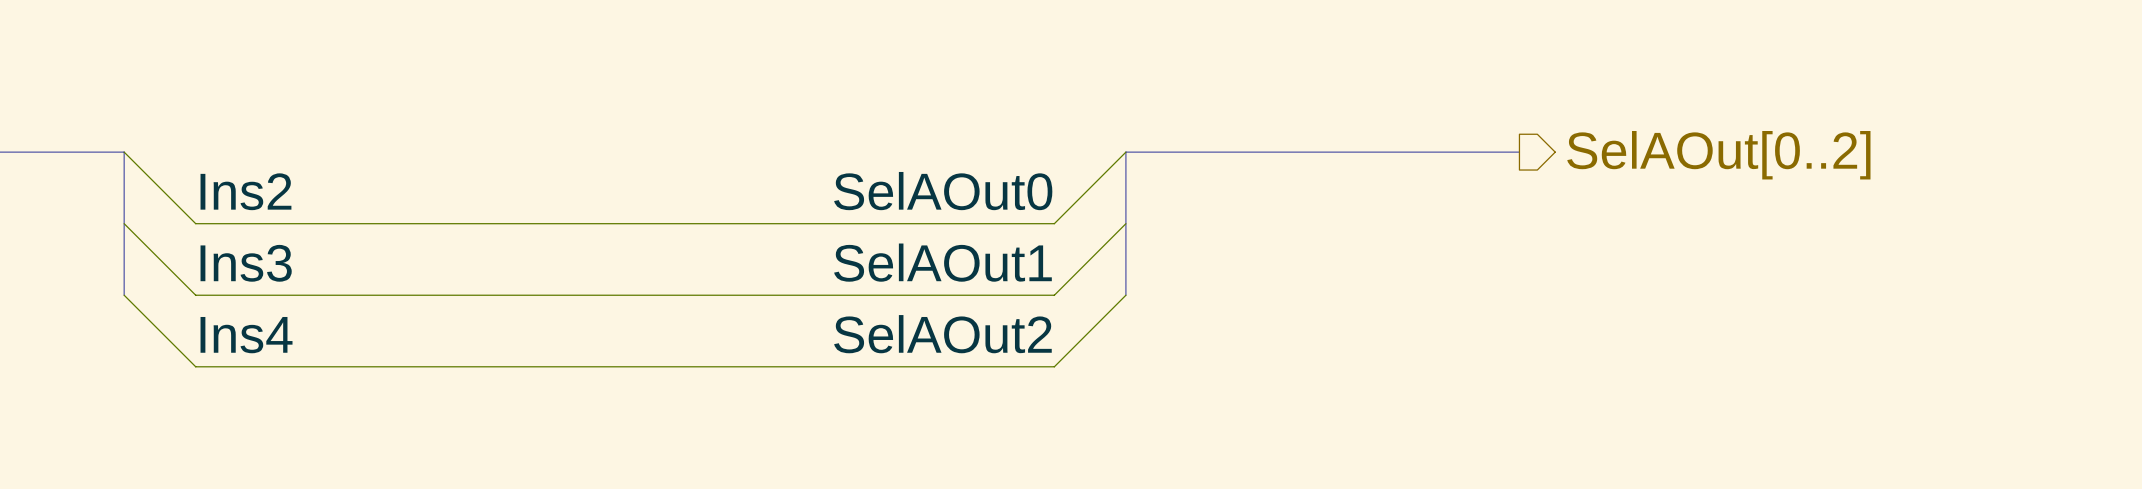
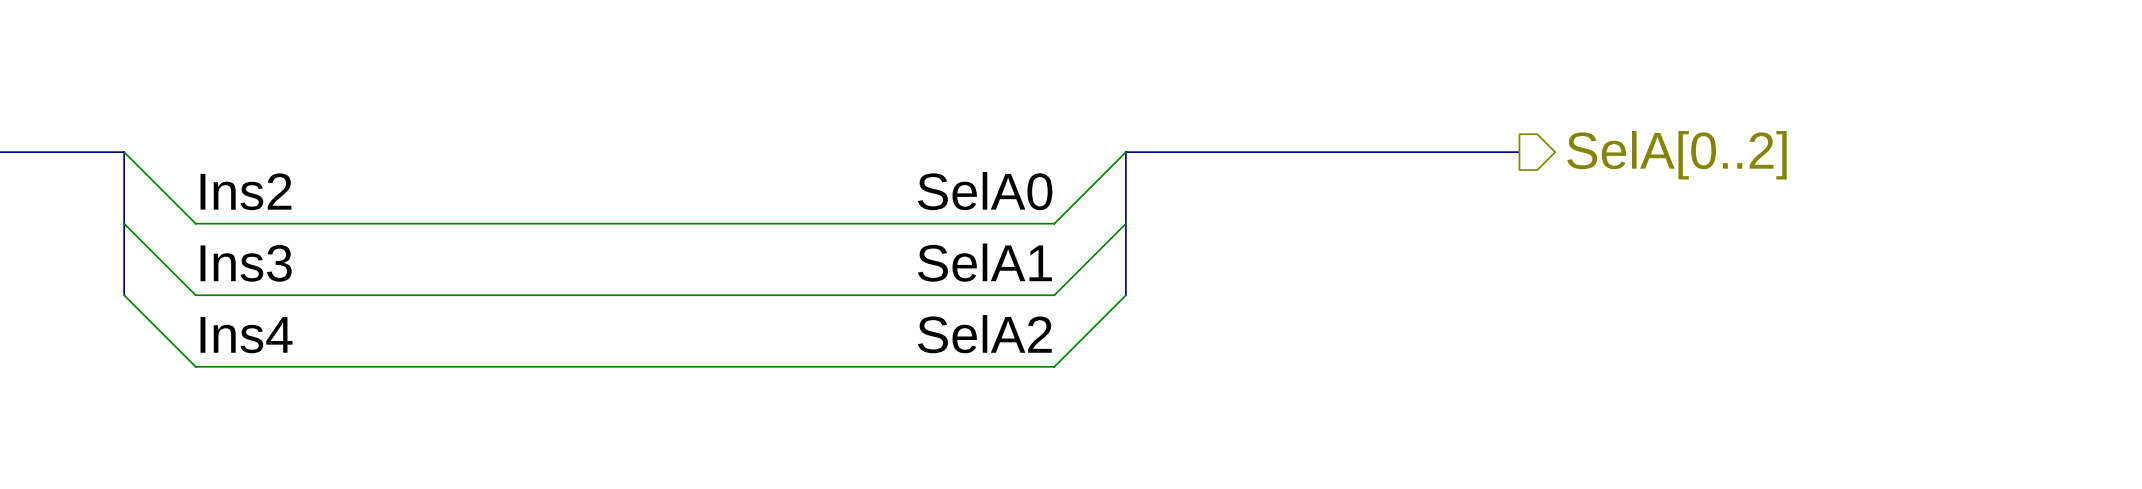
hierarchical label: SelAOut[0..2] (1718, 155) -> SelA[0..2] (1676, 155)
label: SelAOut0 (943, 191) -> SelA0 (985, 191)
label: SelAOut1 (942, 262) -> SelA1 (984, 262)
label: SelAOut2 (942, 334) -> SelA2 (984, 334)

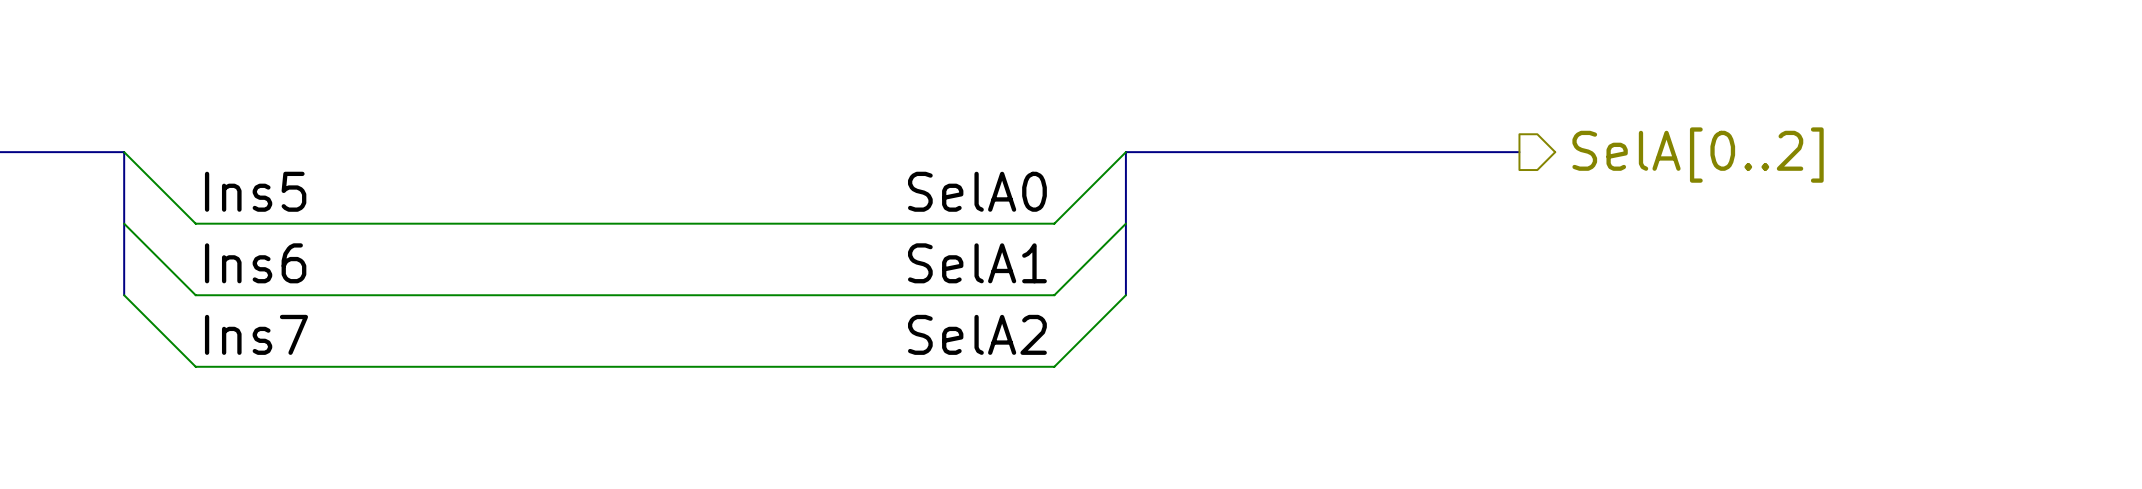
label: Ins2 (245, 191) -> Ins5 (255, 191)
label: Ins3 (246, 263) -> Ins6 (255, 263)
label: Ins4 (246, 335) -> Ins7 (256, 334)

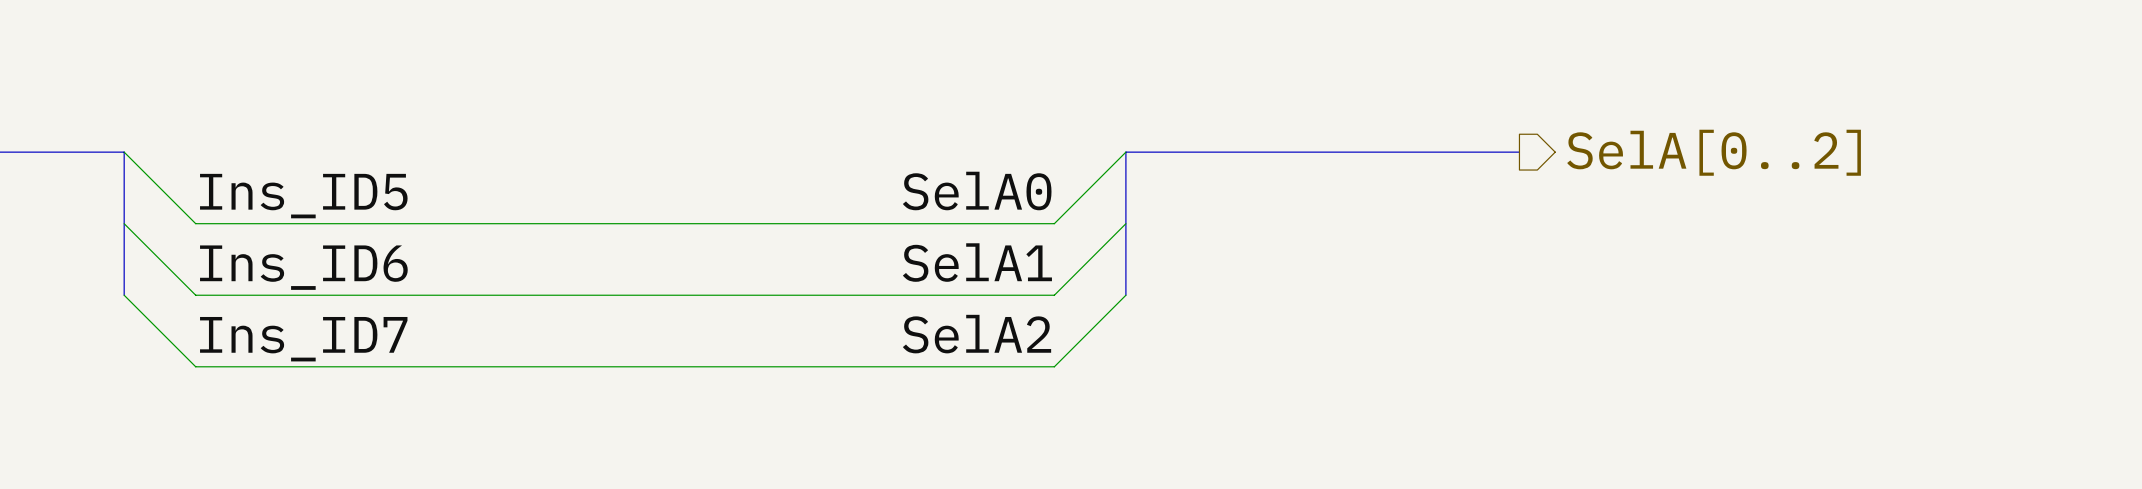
label: Ins5 (255, 191) -> Ins_ID5 (303, 196)
label: Ins6 (255, 263) -> Ins_ID6 (303, 267)
label: Ins7 (256, 334) -> Ins_ID7 (303, 339)

